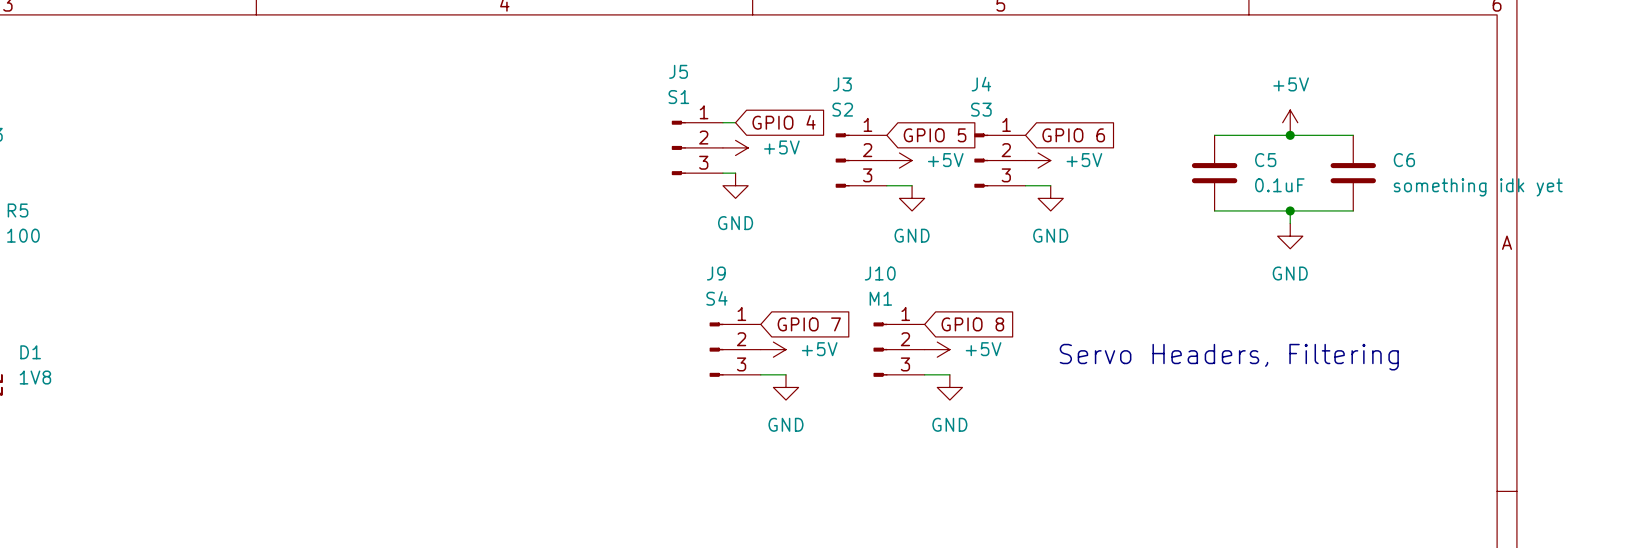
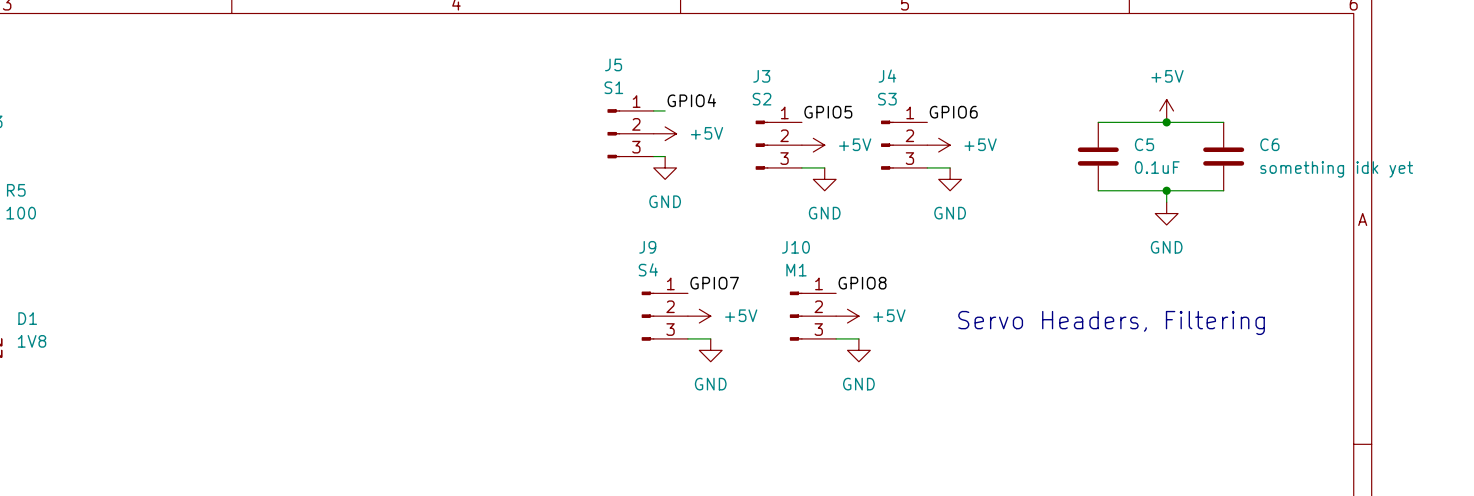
label: none -> GPIO4 (691, 100)
global label: GPIO 4 (784, 122) -> none
label: none -> GPIO5 (828, 112)
label: none -> GPIO6 (953, 112)
global label: GPIO 5 (935, 135) -> none
global label: GPIO 6 (1073, 135) -> none
label: none -> GPIO7 (714, 283)
label: none -> GPIO8 (862, 283)
global label: GPIO 7 (809, 324) -> none
global label: GPIO 8 (972, 324) -> none

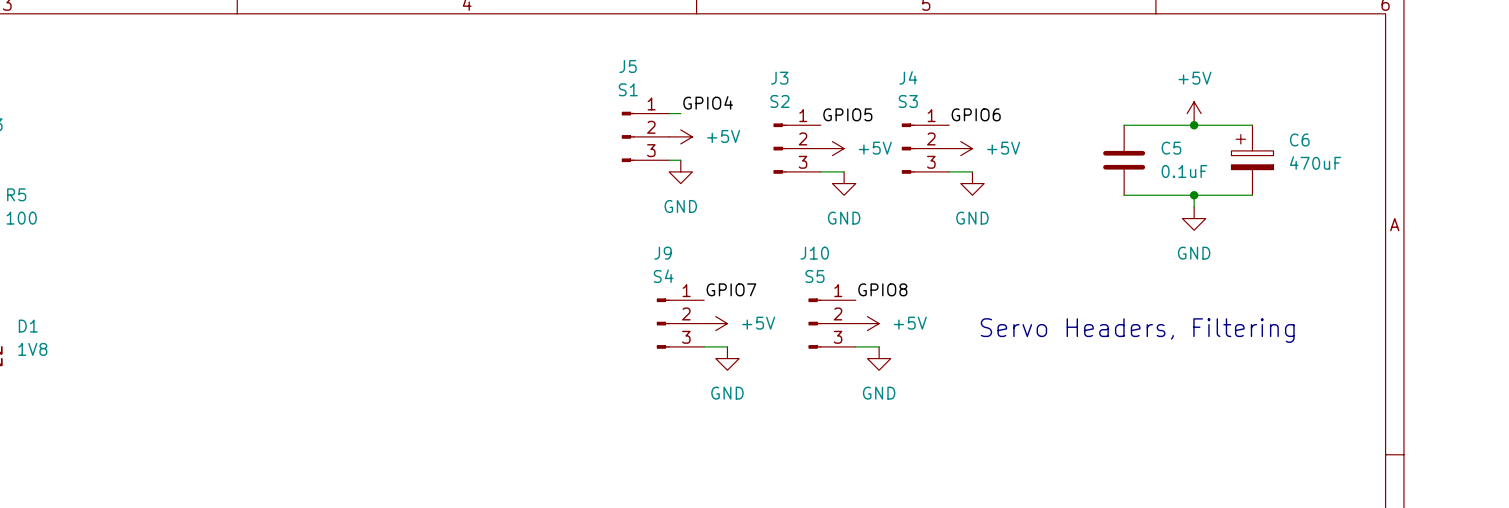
C6 symbol: [1203, 122, 1245, 191] -> [1231, 125, 1274, 196]
C6 value: something idk yet (1336, 169) -> 470uF (1315, 163)
J10 value: M1 (796, 270) -> S5 (814, 276)

